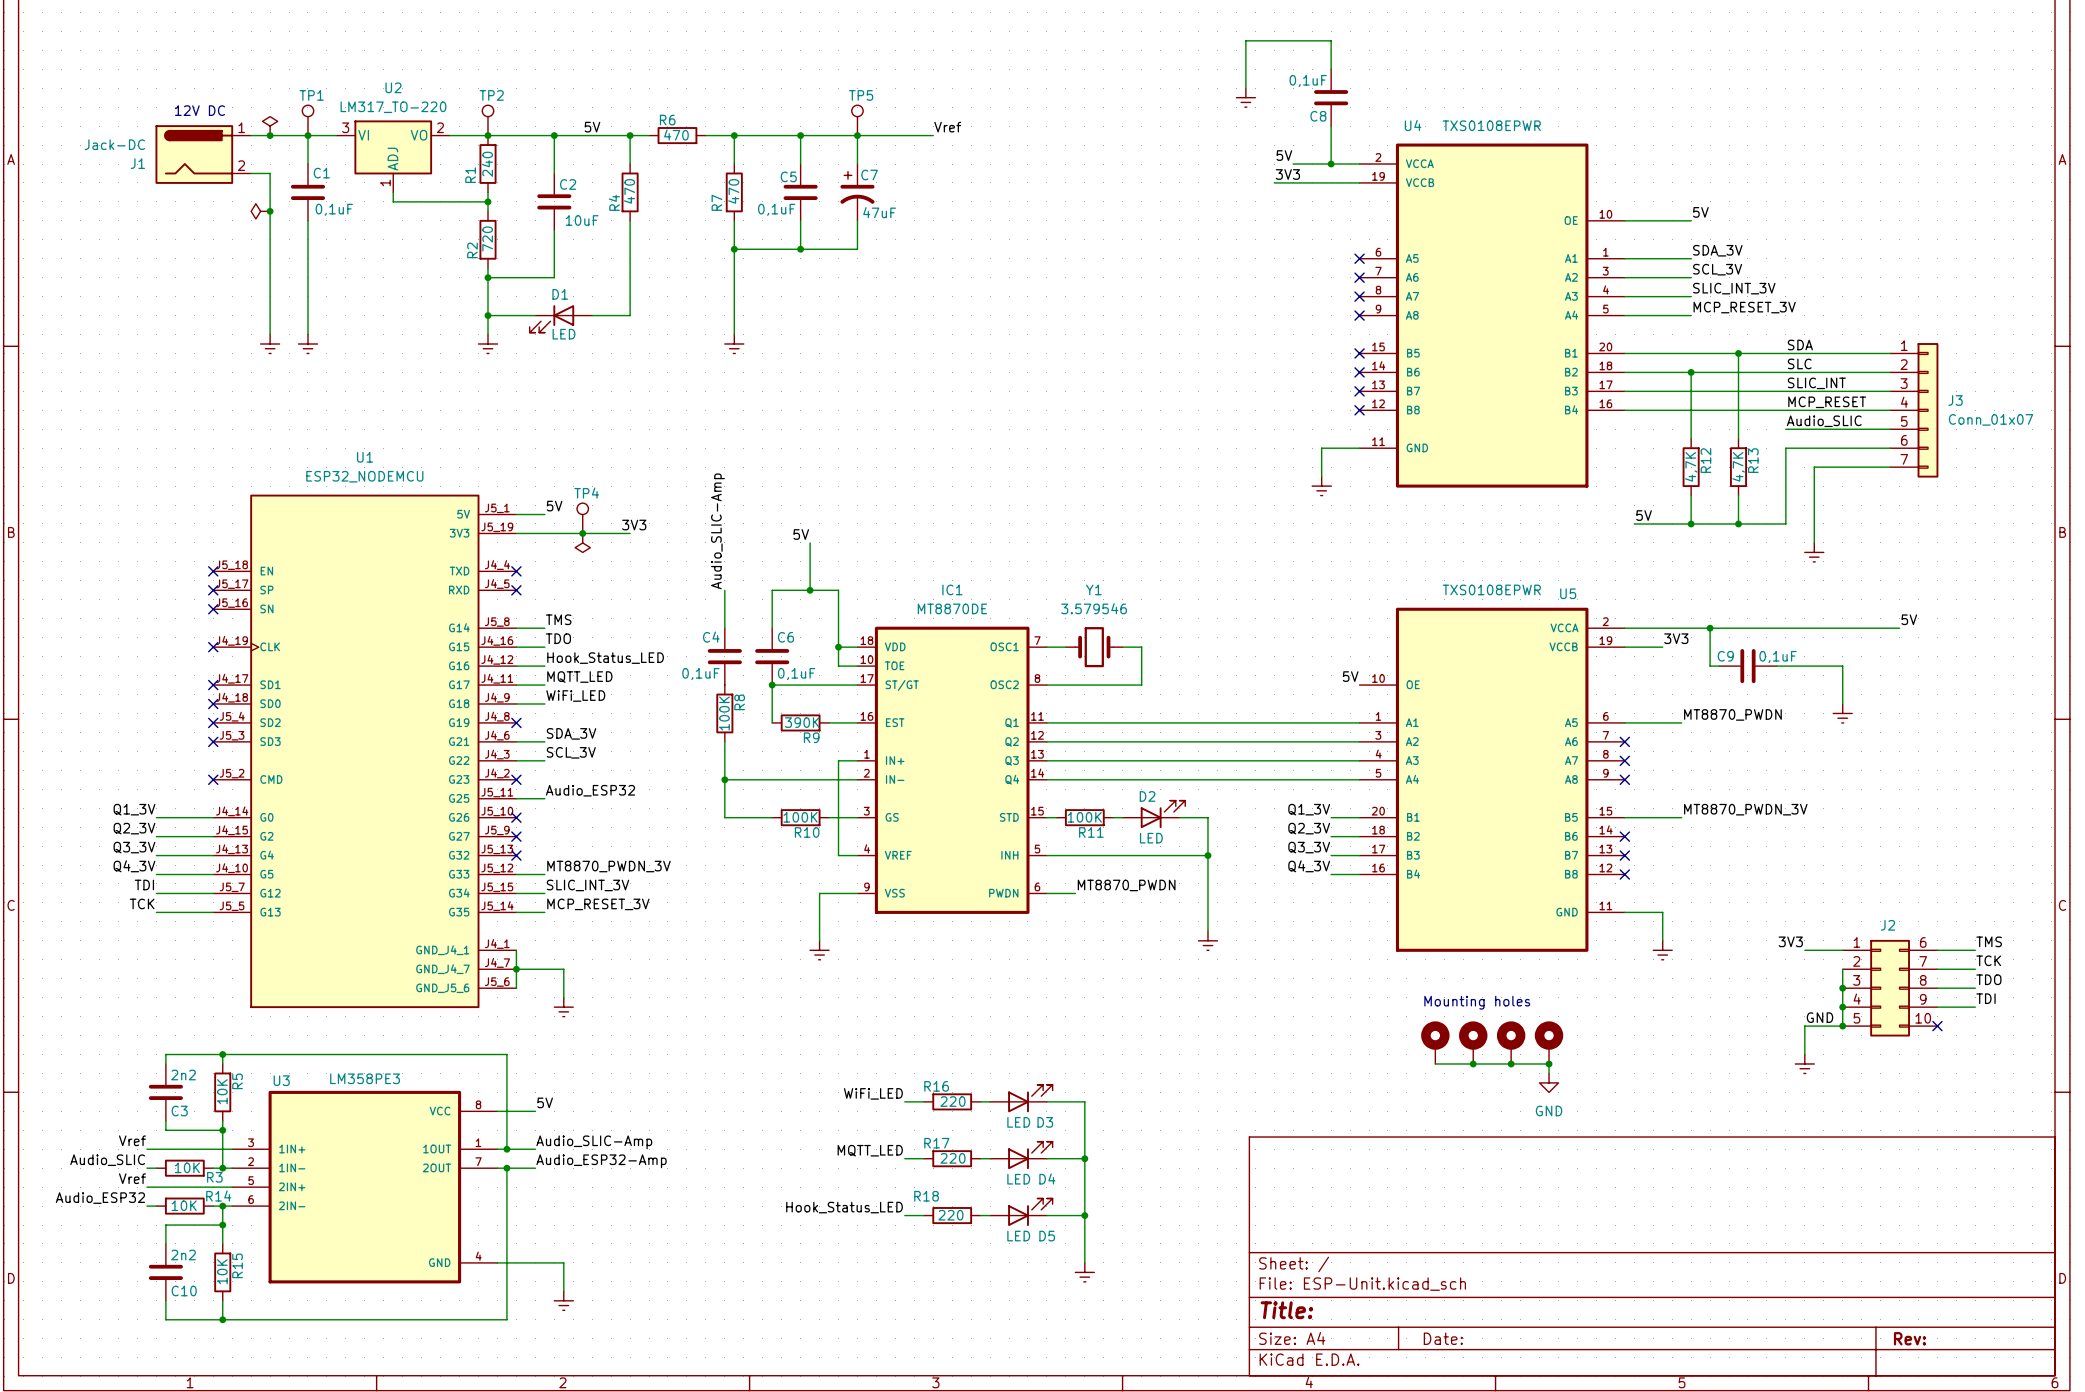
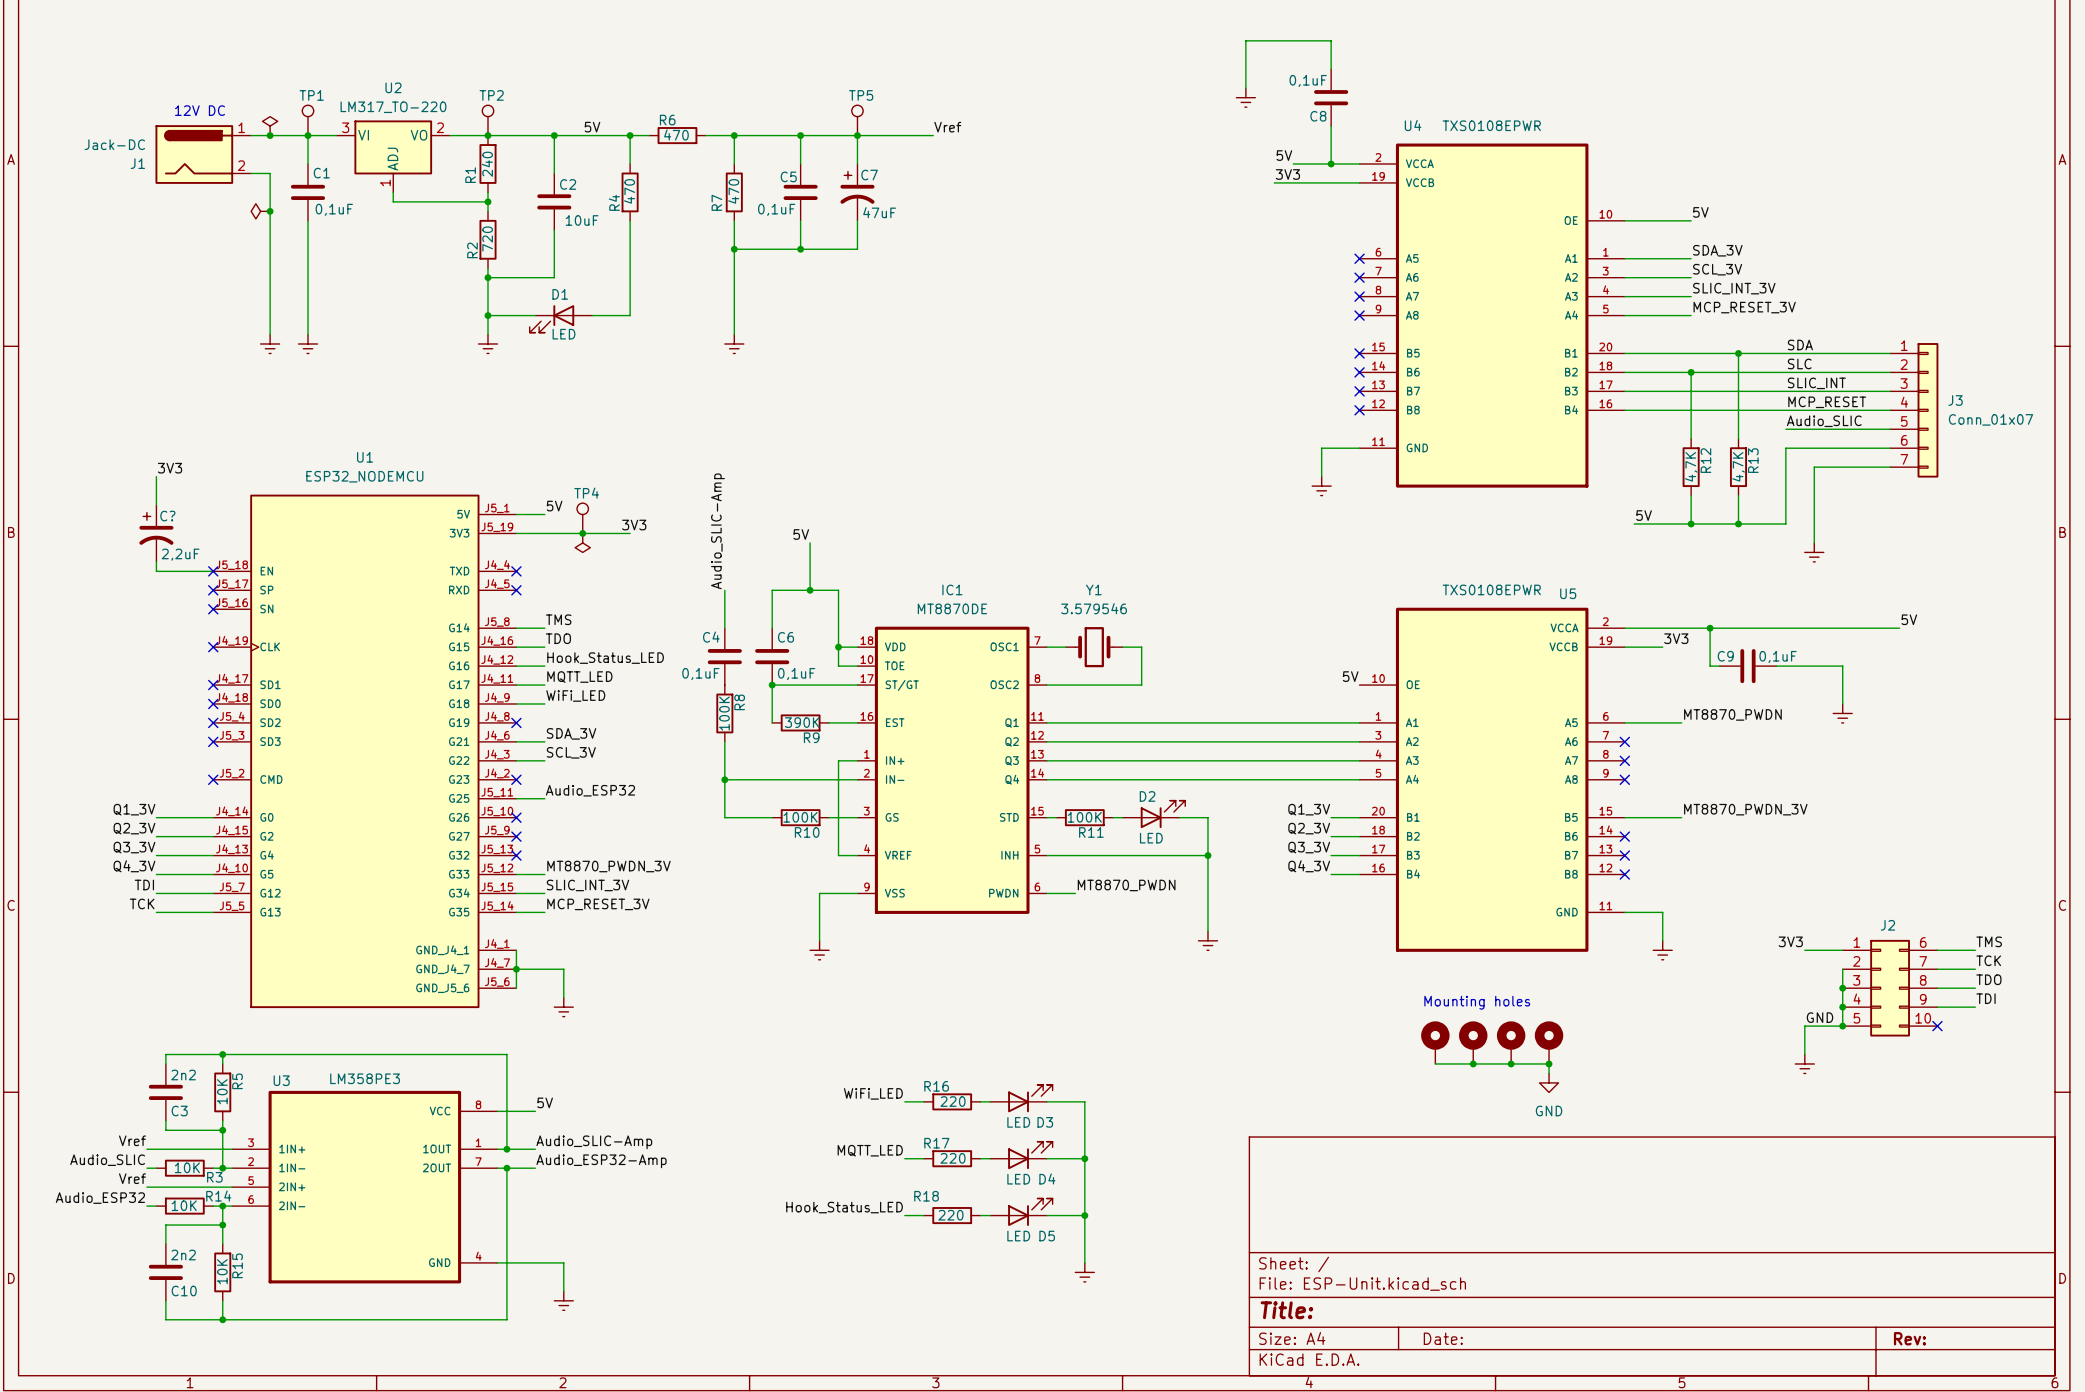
label: none -> 3V3 (170, 468)
wire: none -> (156, 476) (156, 505)
C?: none -> 2,2uF (156, 533)
wire: none -> (156, 561) (156, 571) (213, 571)

